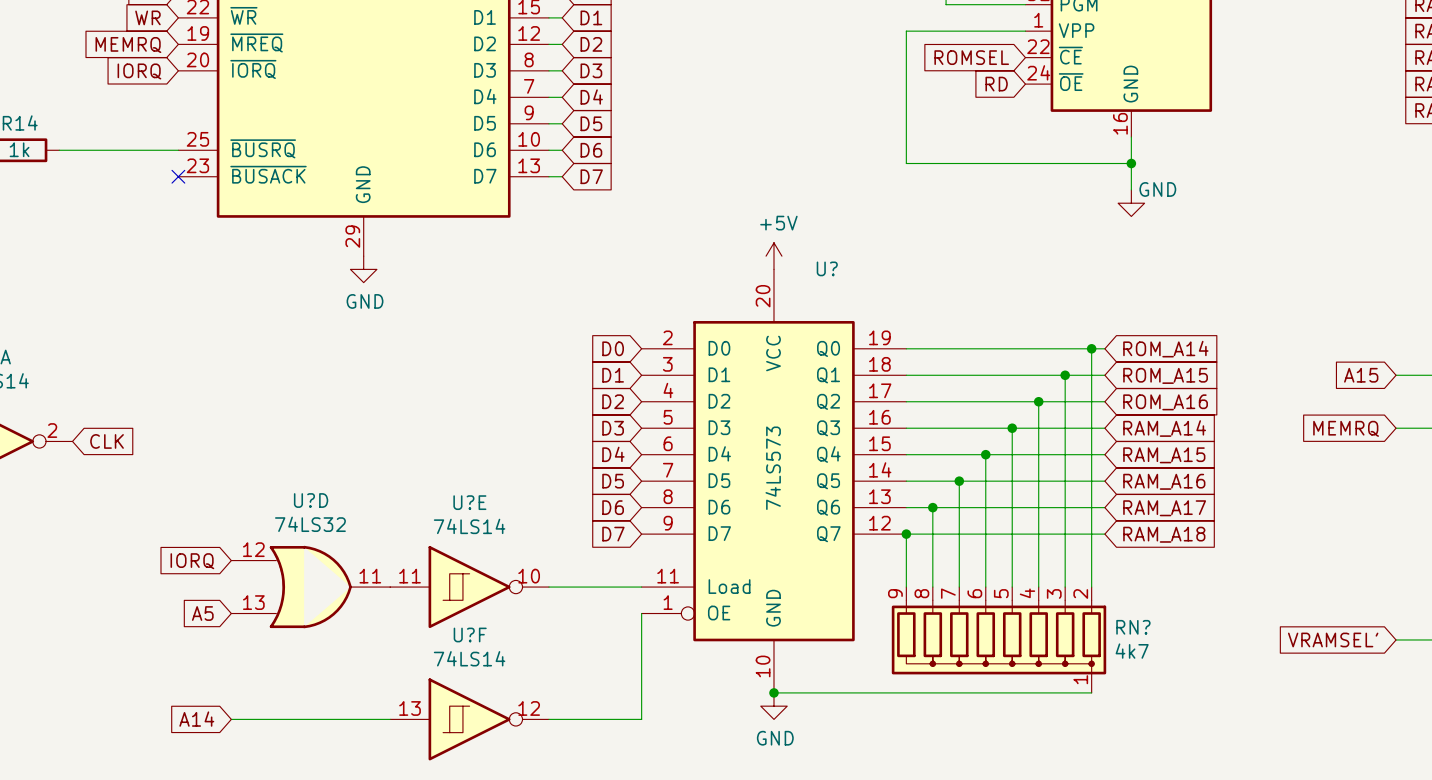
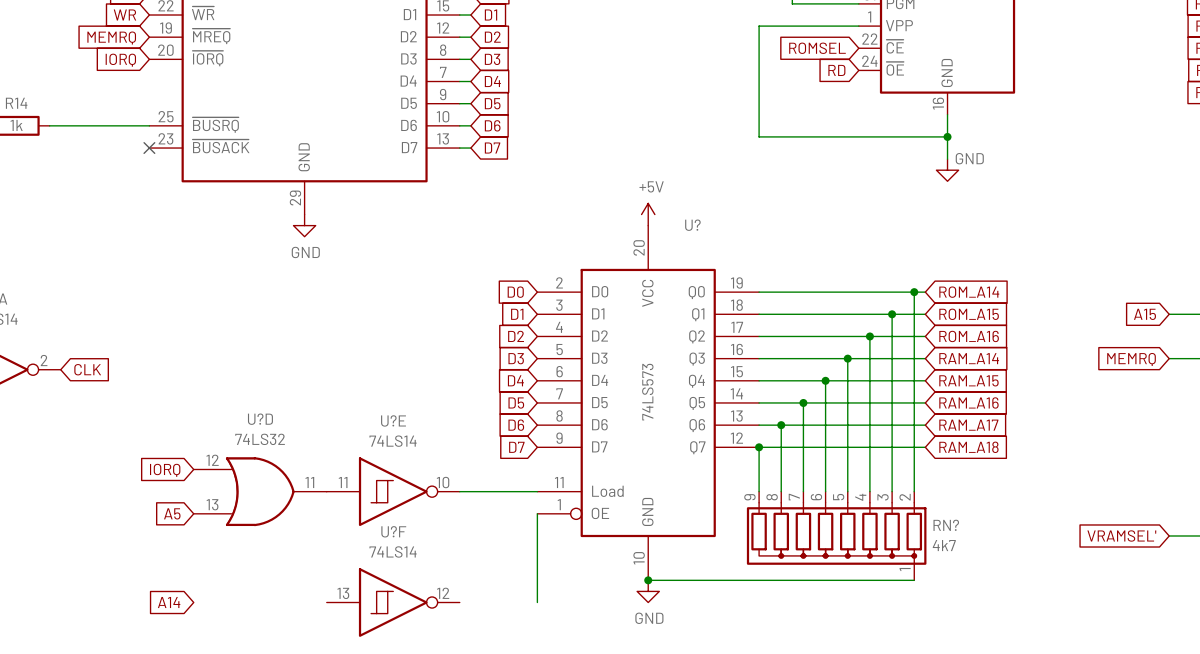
wire: (231, 719) (390, 719) -> none
wire: (548, 719) (641, 719) -> none

